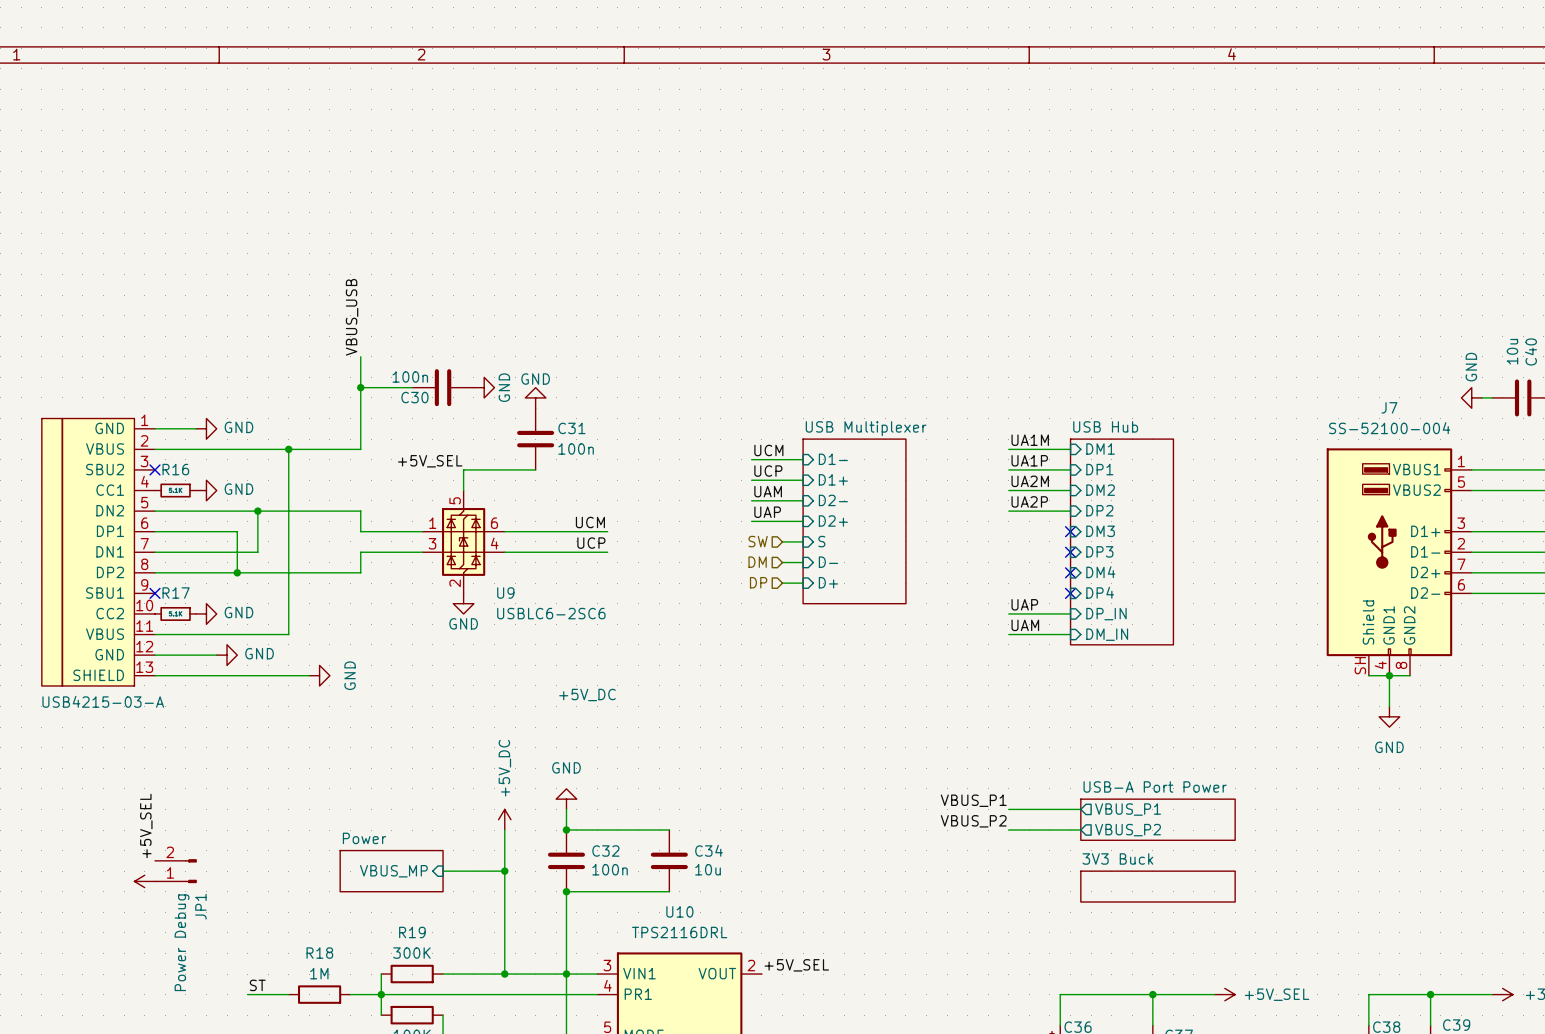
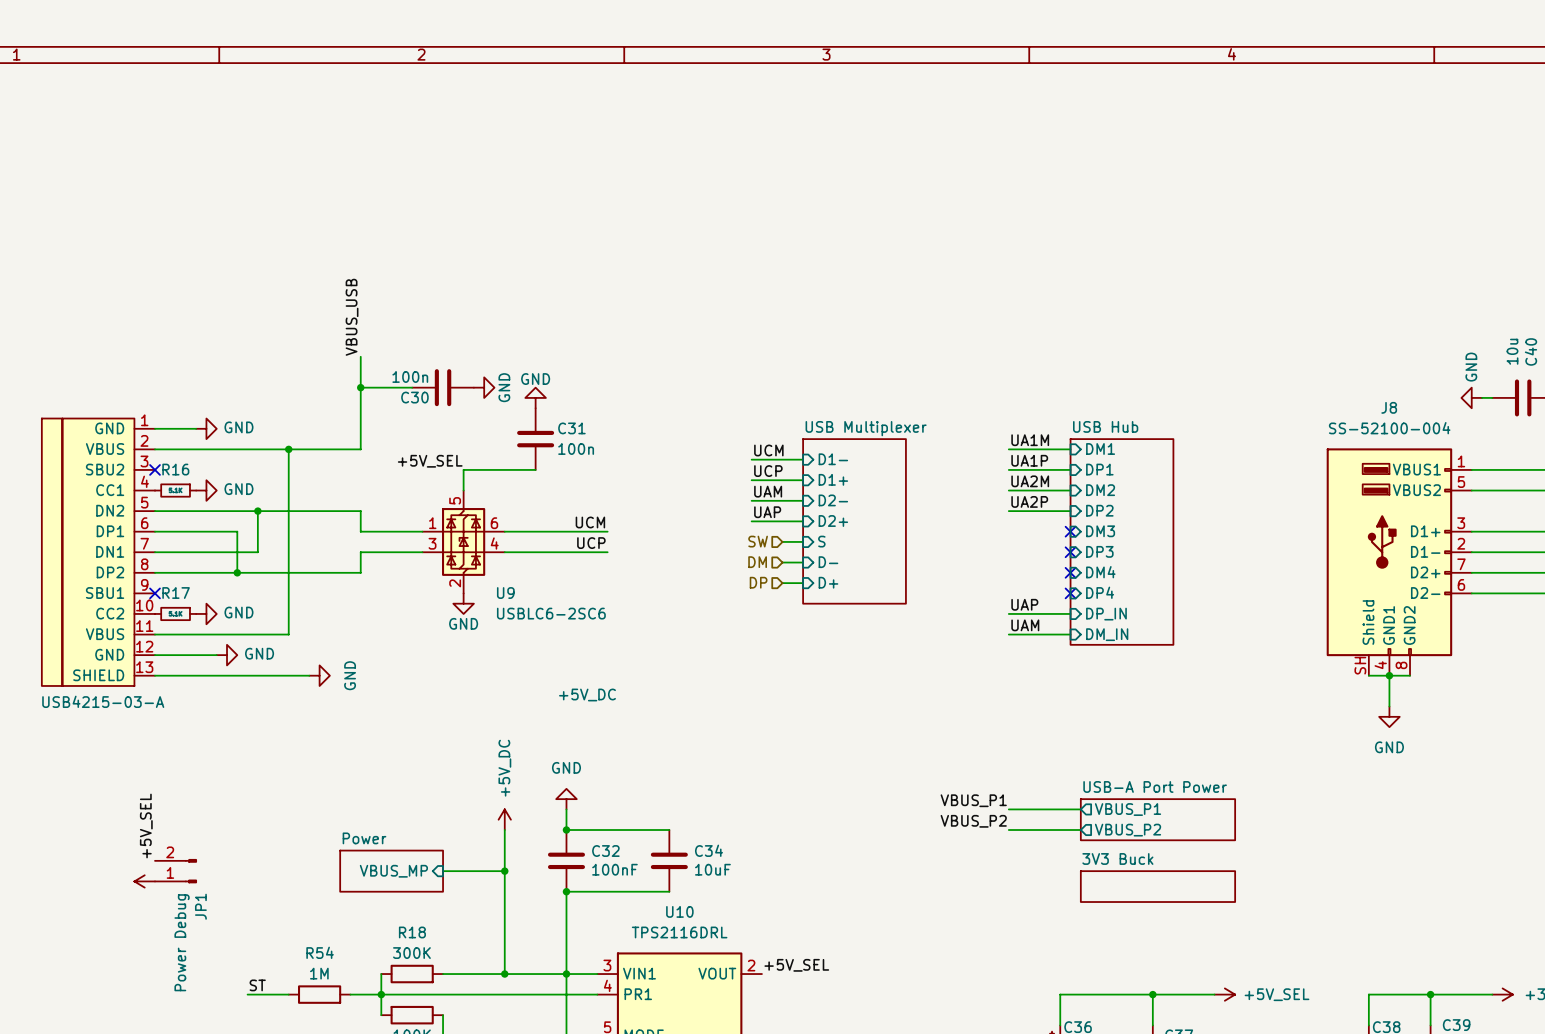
J7 name: J7 (1389, 407) -> J8 (1389, 407)
C32 value: 100n (610, 869) -> 100nF (614, 869)
C34 value: 10u (708, 869) -> 10uF (712, 869)
R19 name: R19 (412, 932) -> R18 (412, 932)
R18 name: R18 (319, 953) -> R54 (320, 952)

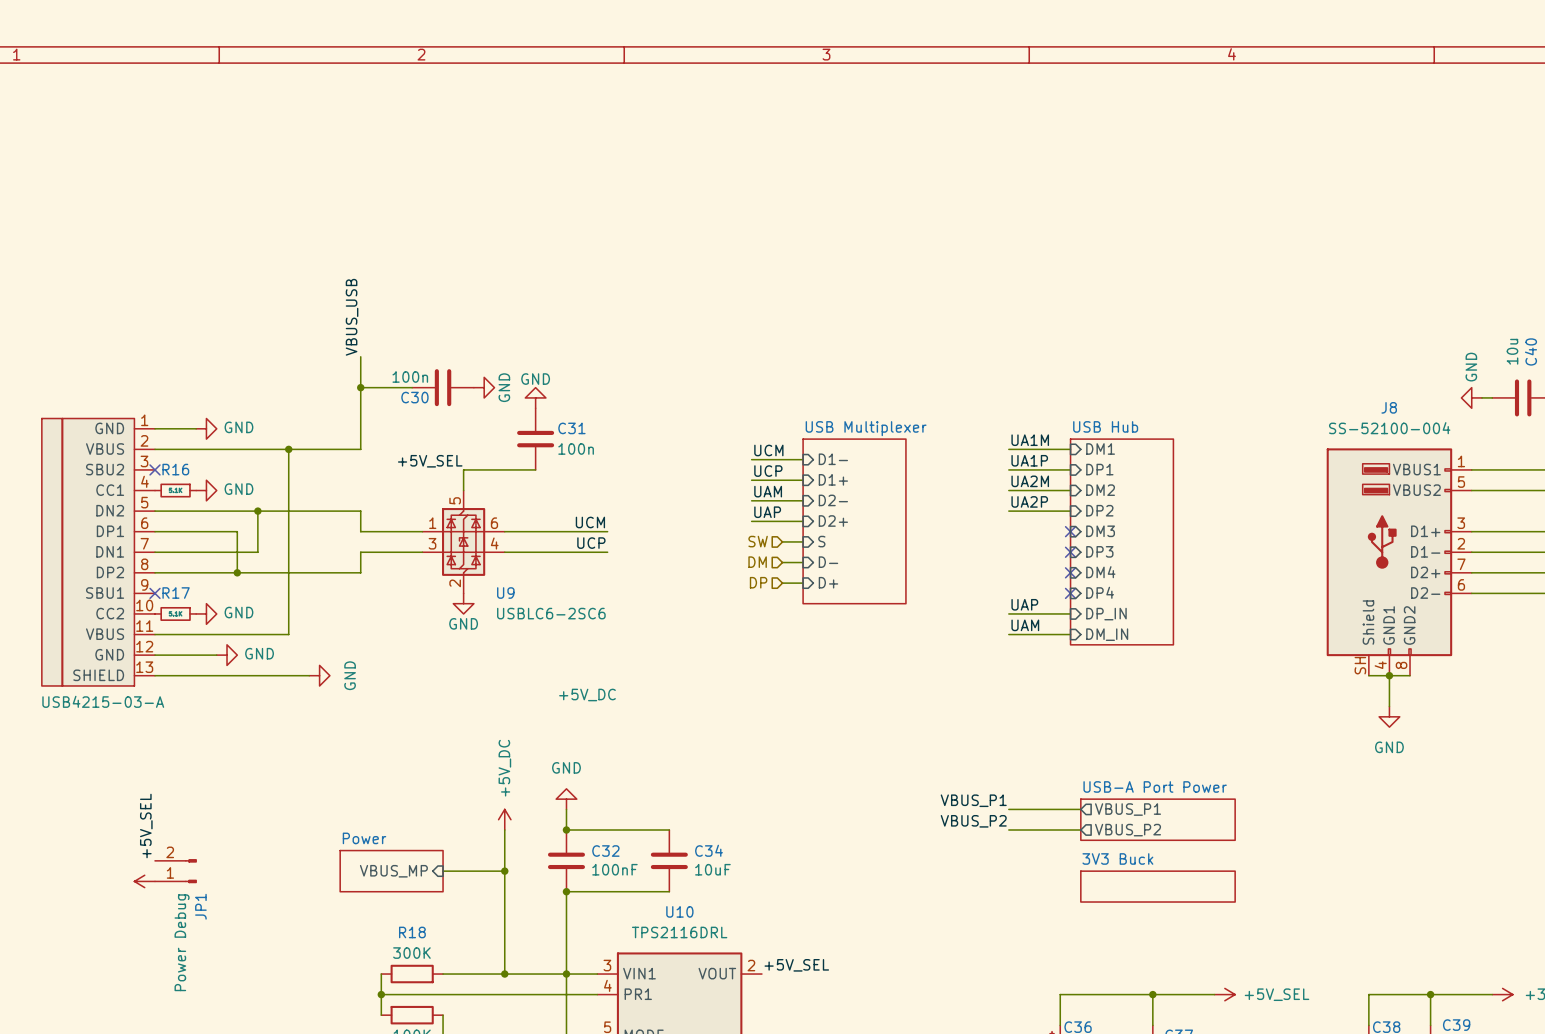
label: ST (257, 985) -> none
wire: (247, 994) (288, 994) -> none
R54: 1M (319, 994) -> none
wire: (350, 994) (381, 994) -> none

